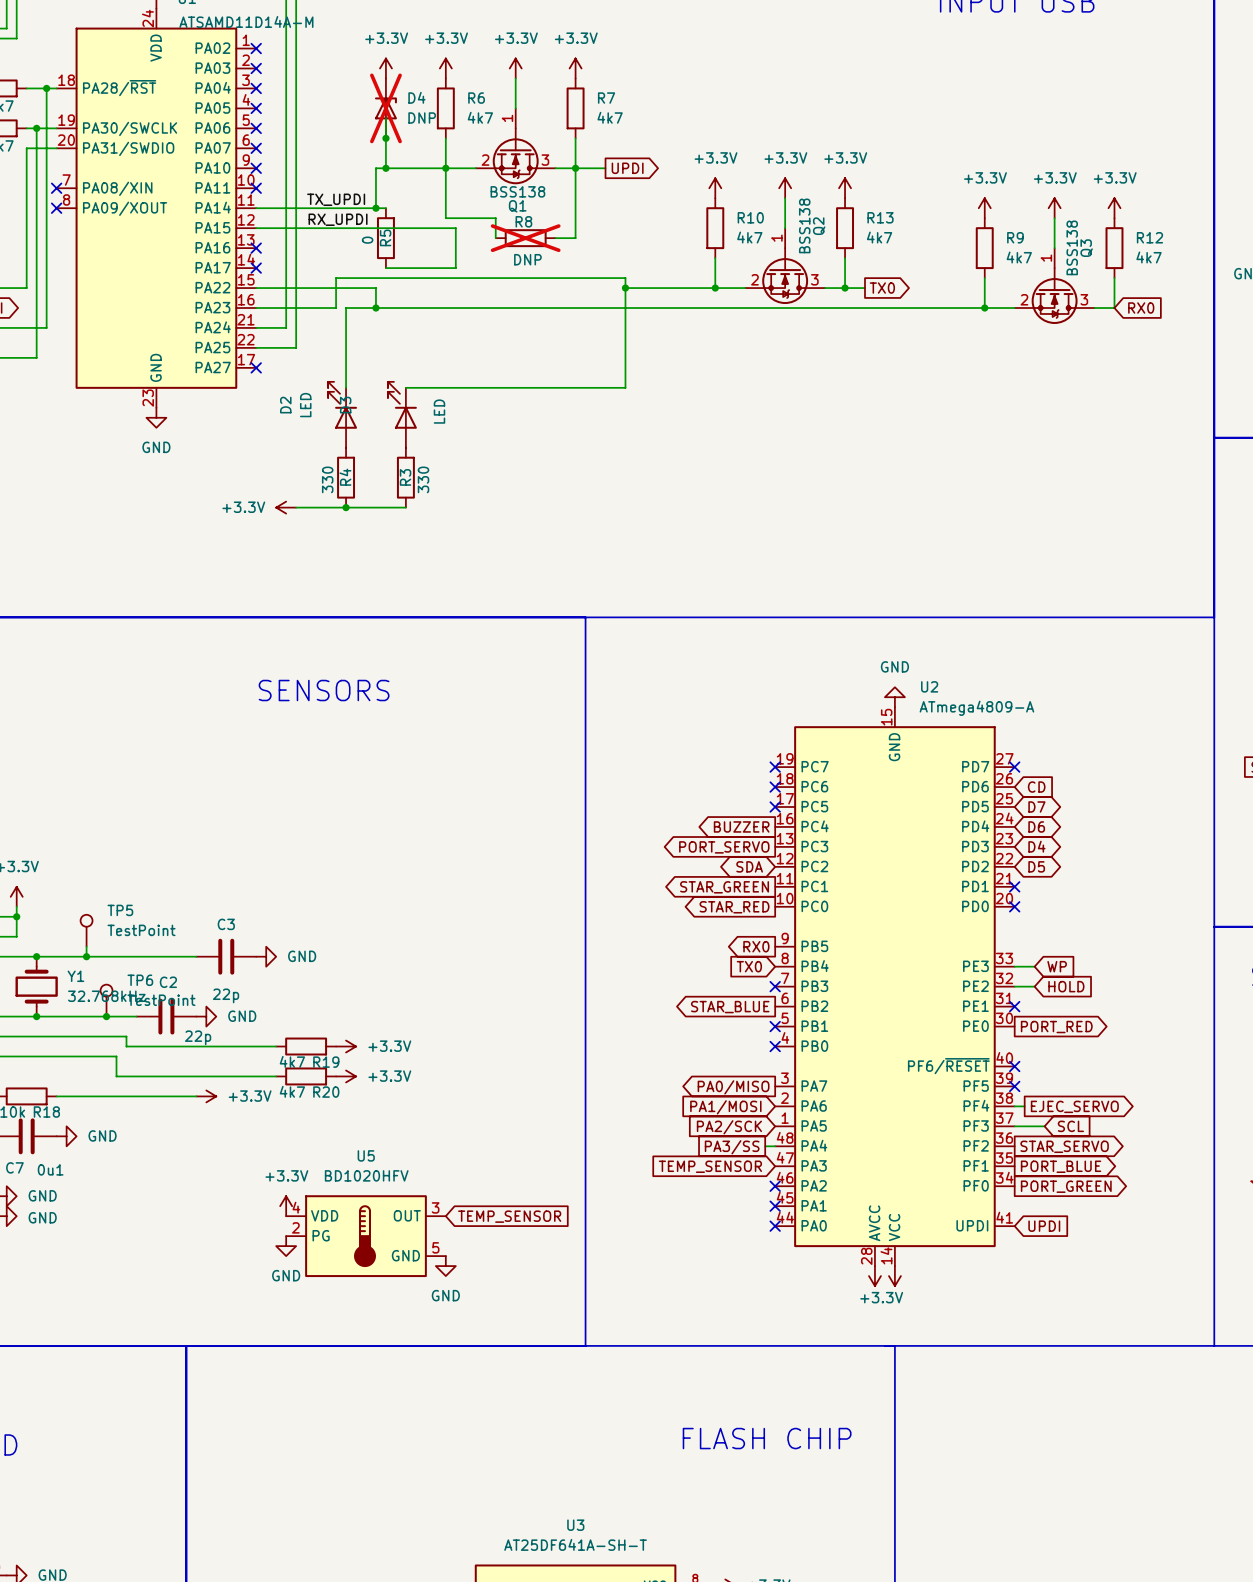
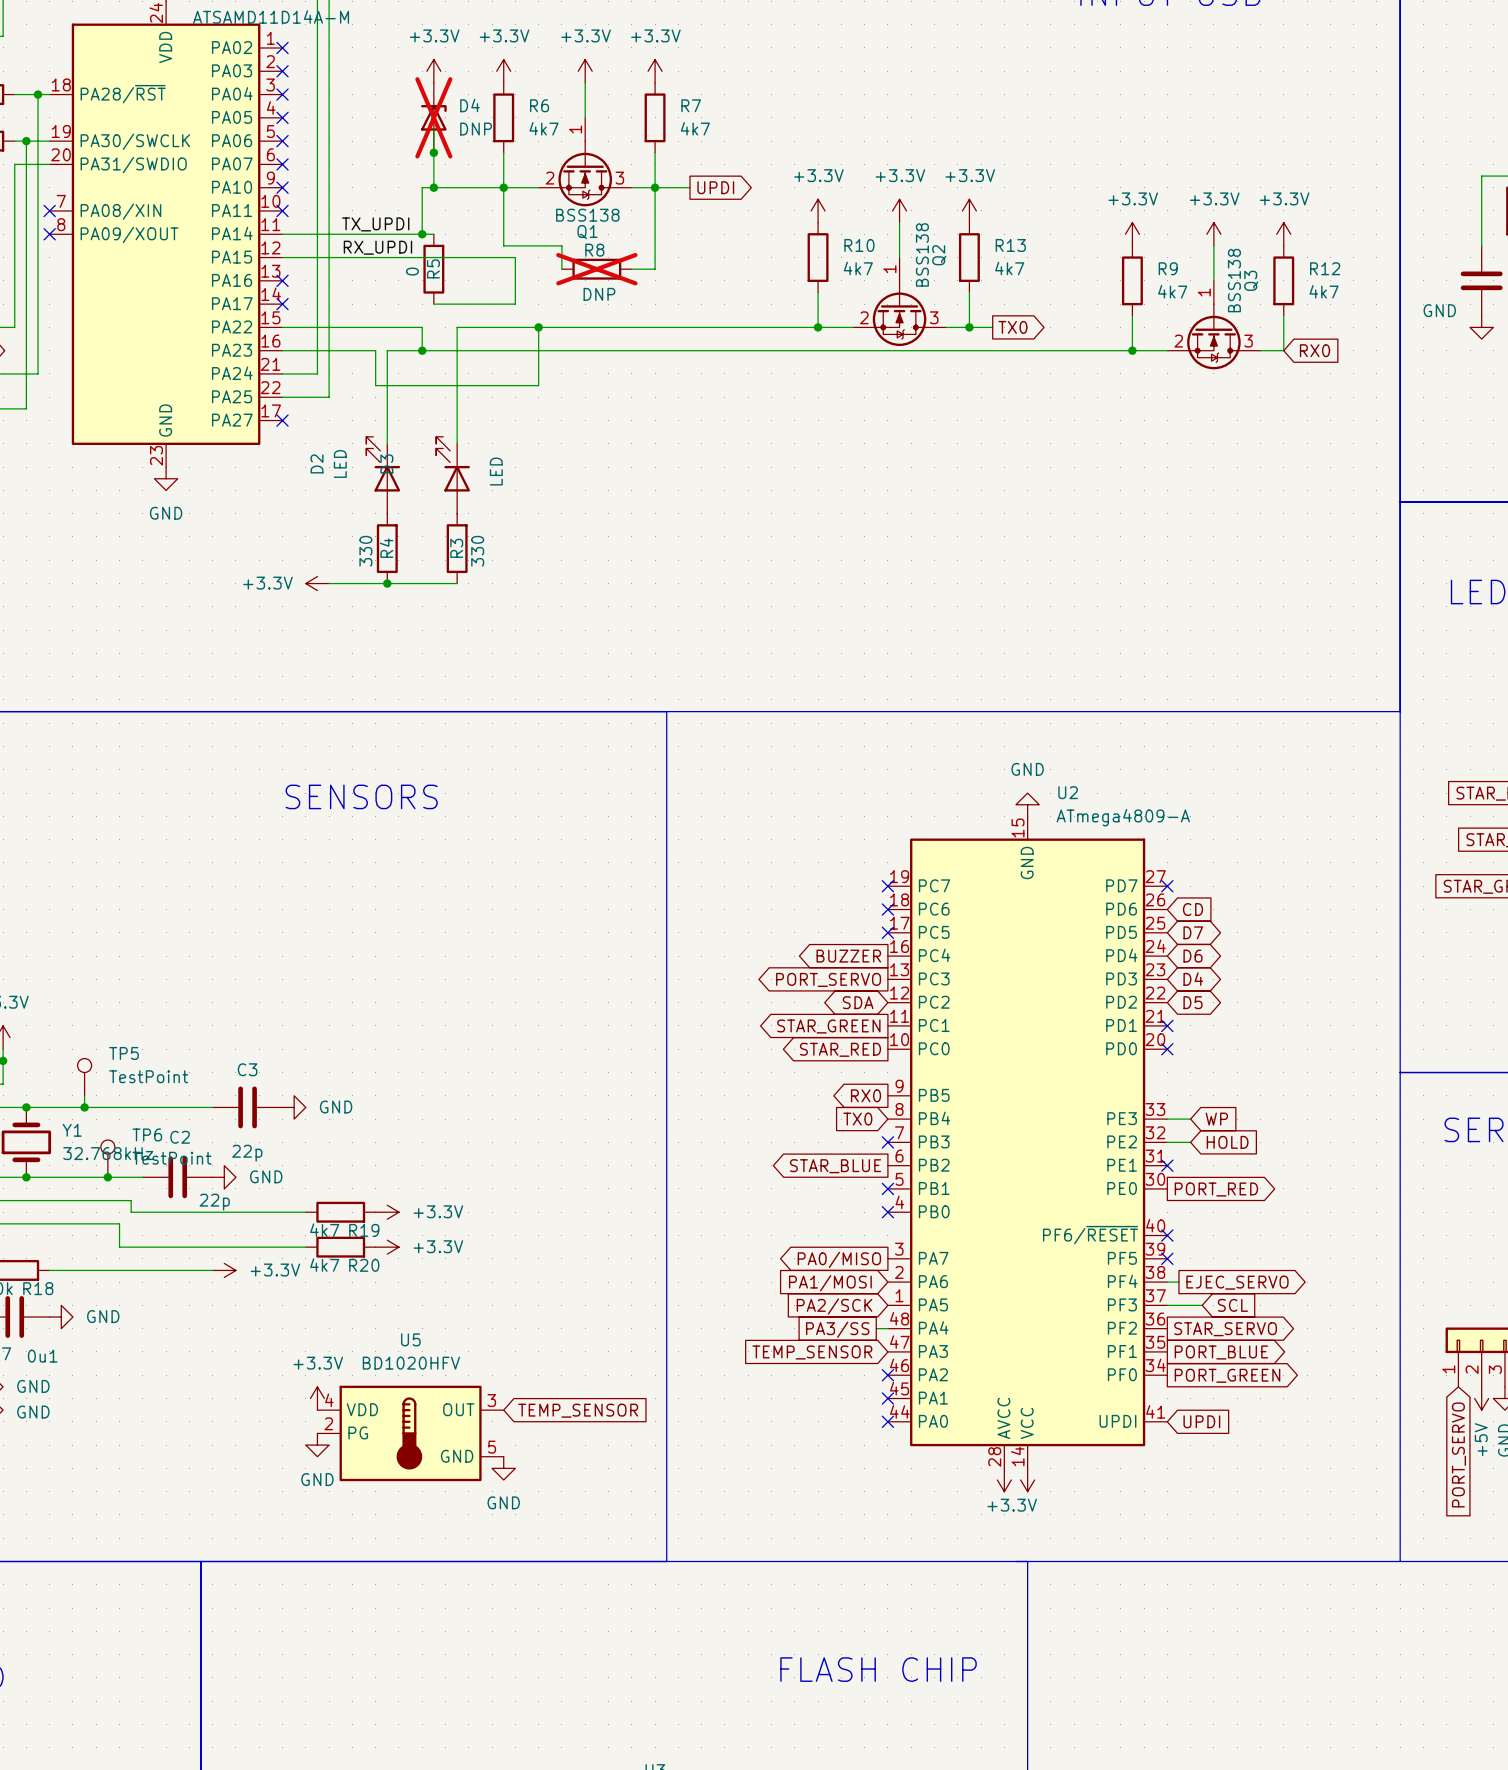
junction: none -> (538, 327)
wire: none -> (713, 327) (457, 327) (457, 443)
junction: (625, 288) -> none
wire: (336, 308) (336, 278) (625, 278) (625, 387) (405, 387) -> (375, 350) (375, 385) (538, 385) (538, 327)

